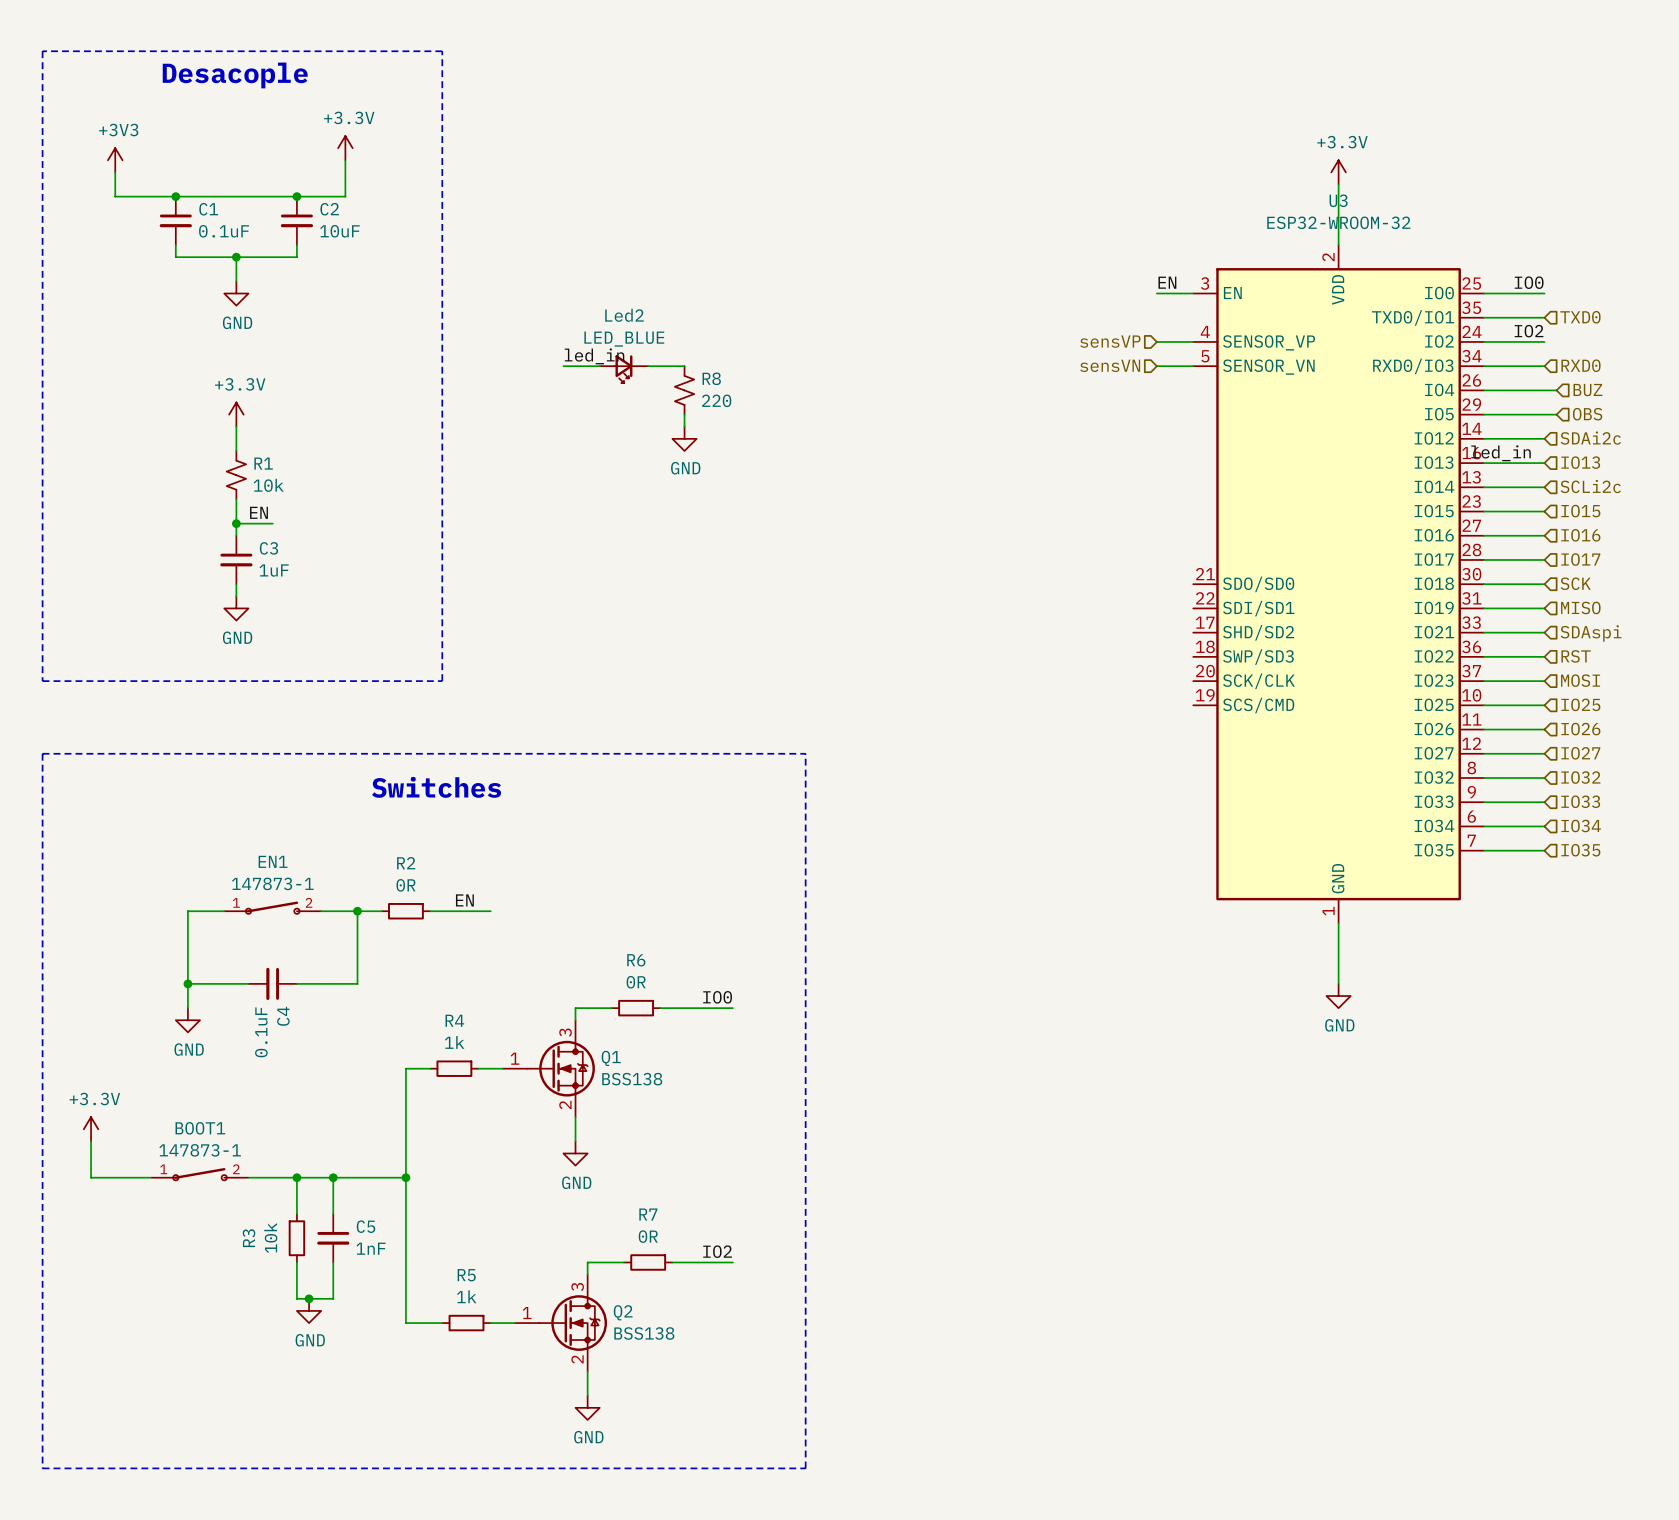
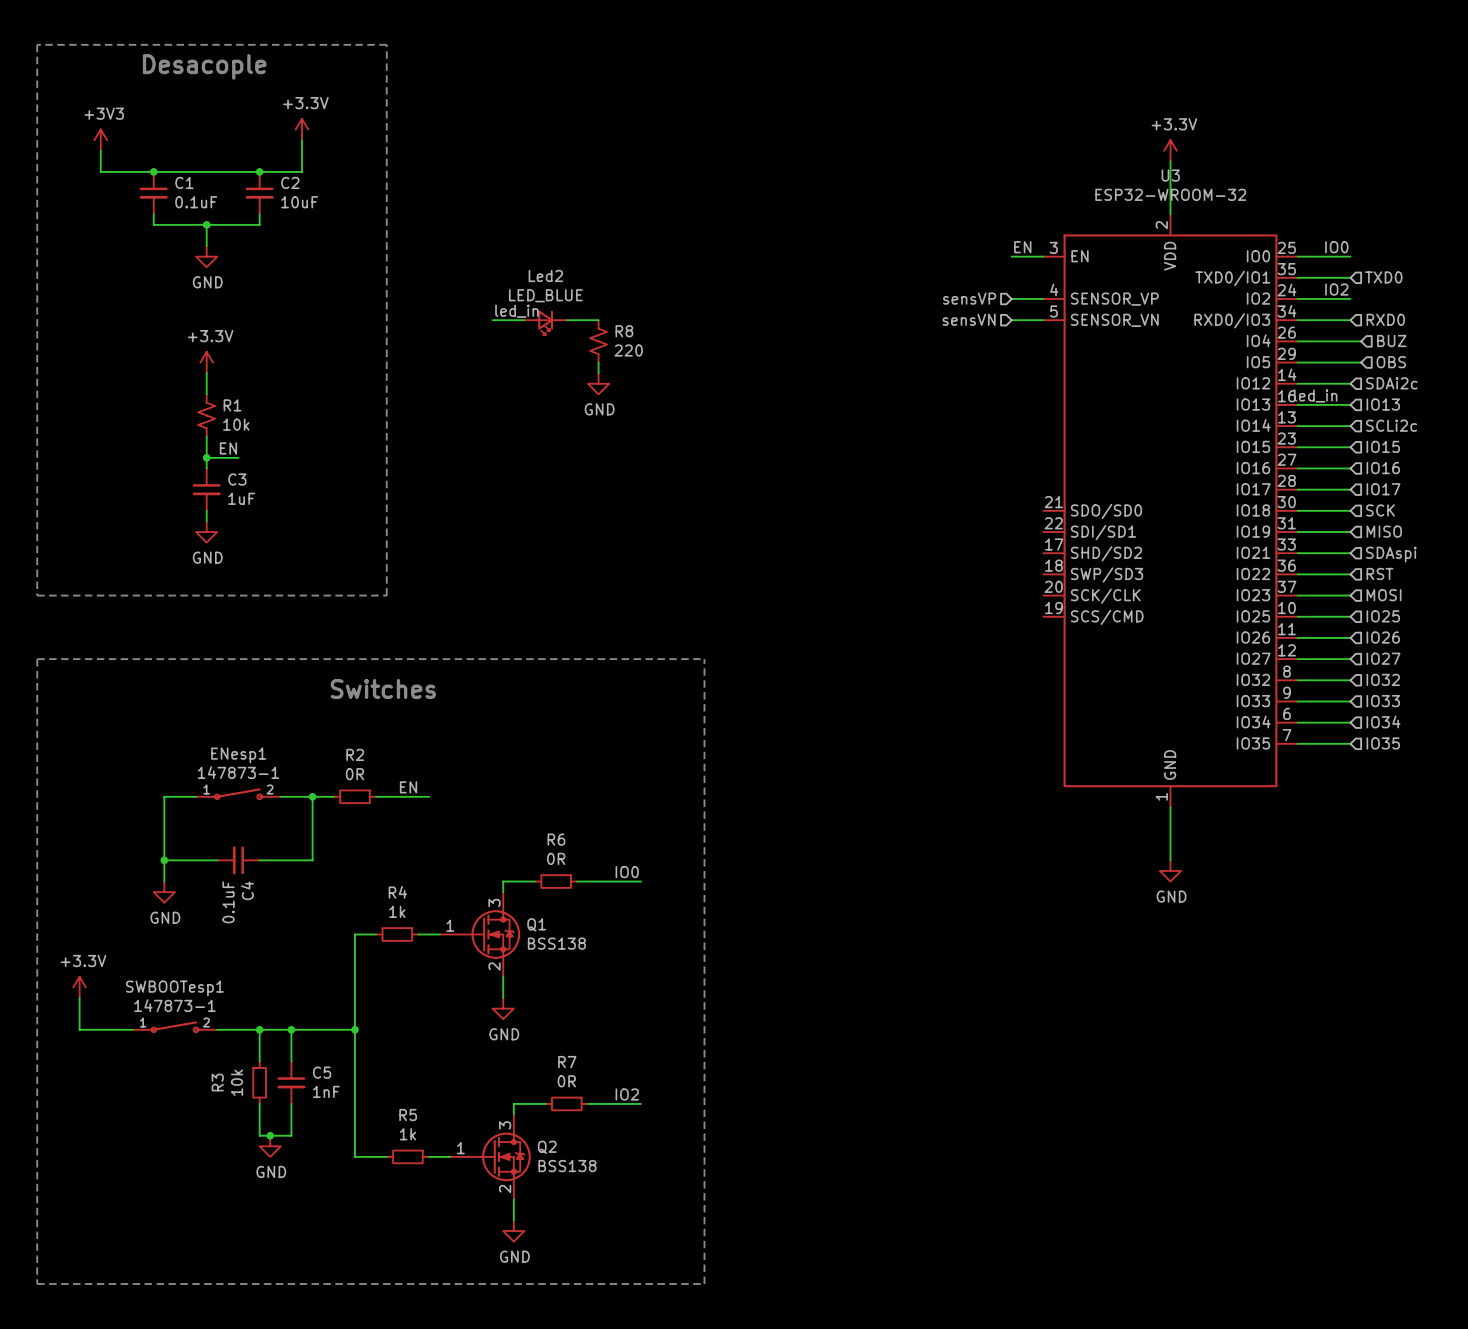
EN1 name: EN1 (273, 861) -> ENesp1 (238, 755)
BOOT1 name: BOOT1 (200, 1128) -> SWBOOTesp1 (174, 988)

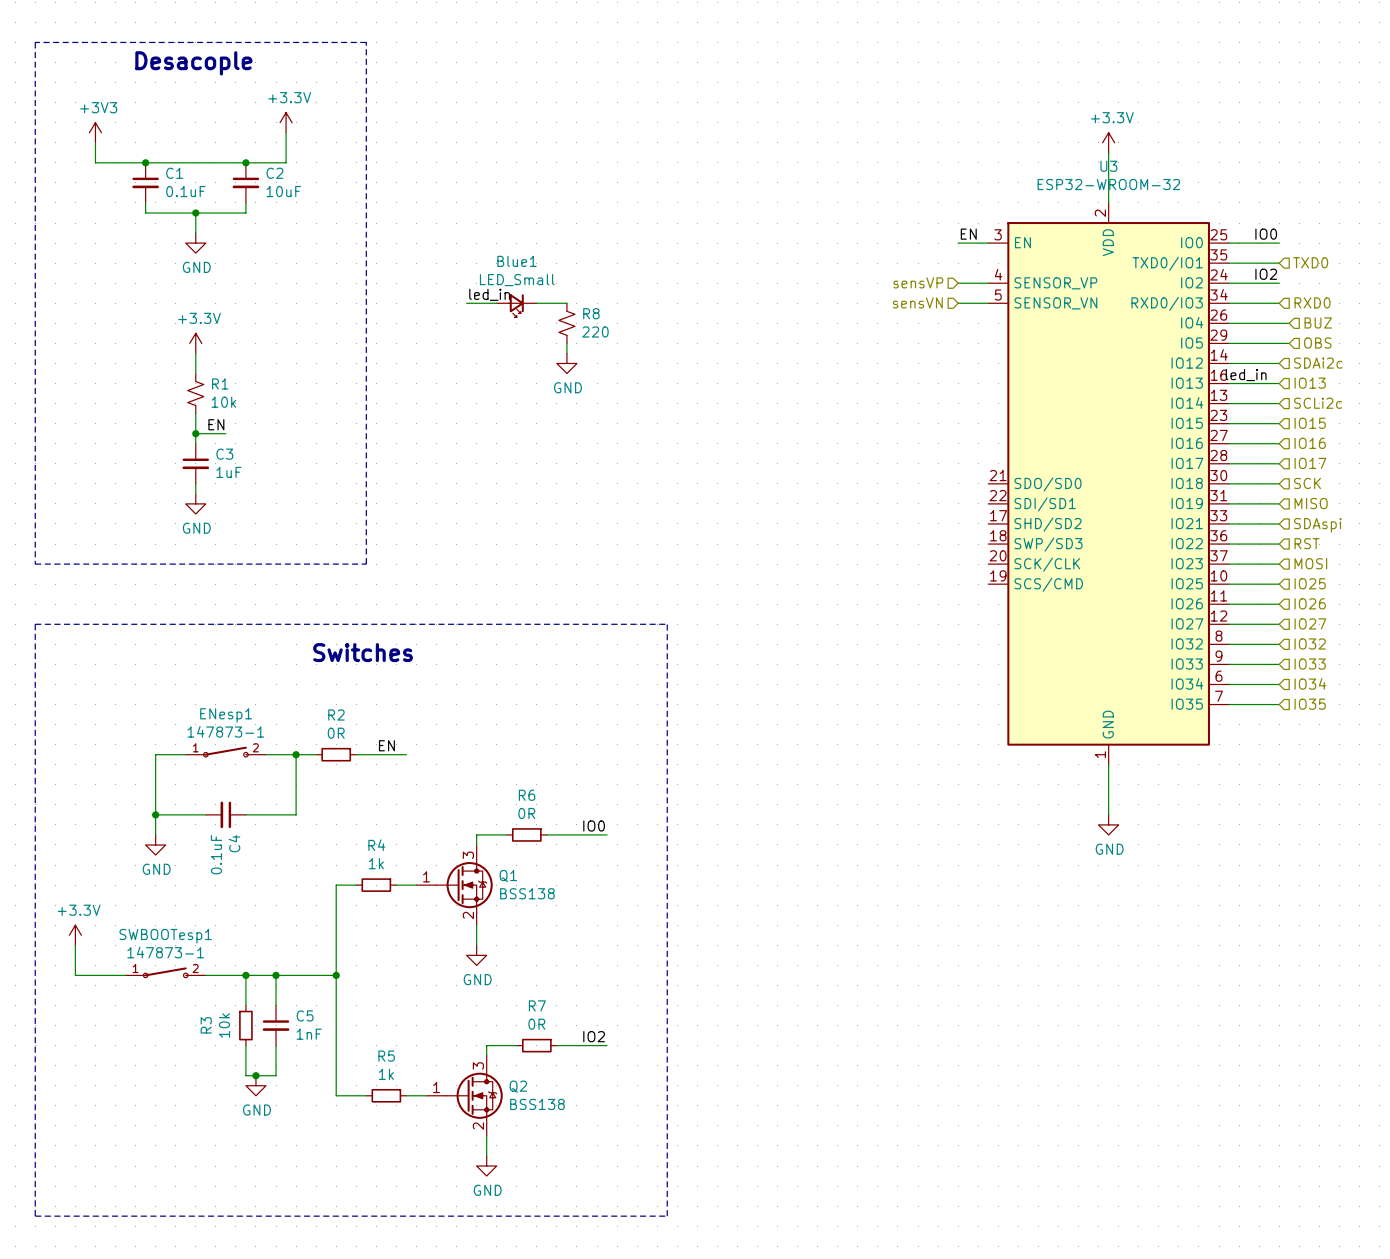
Led2 name: Led2 (545, 275) -> Blue1 (517, 261)
Led2 value: LED_BLUE (545, 295) -> LED_Small (517, 280)

